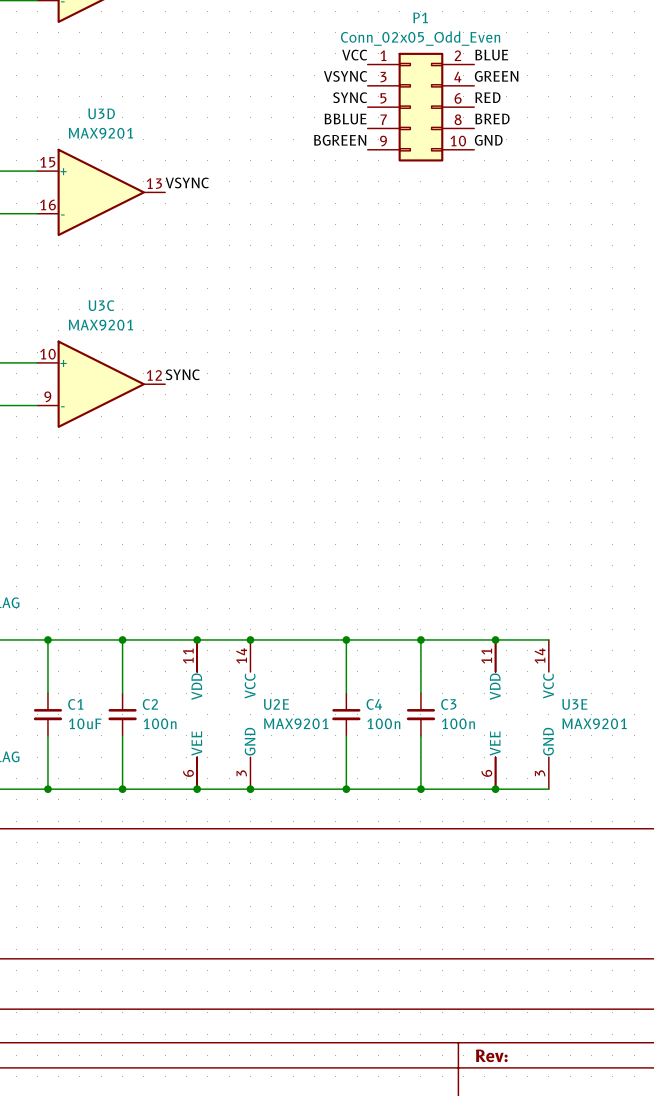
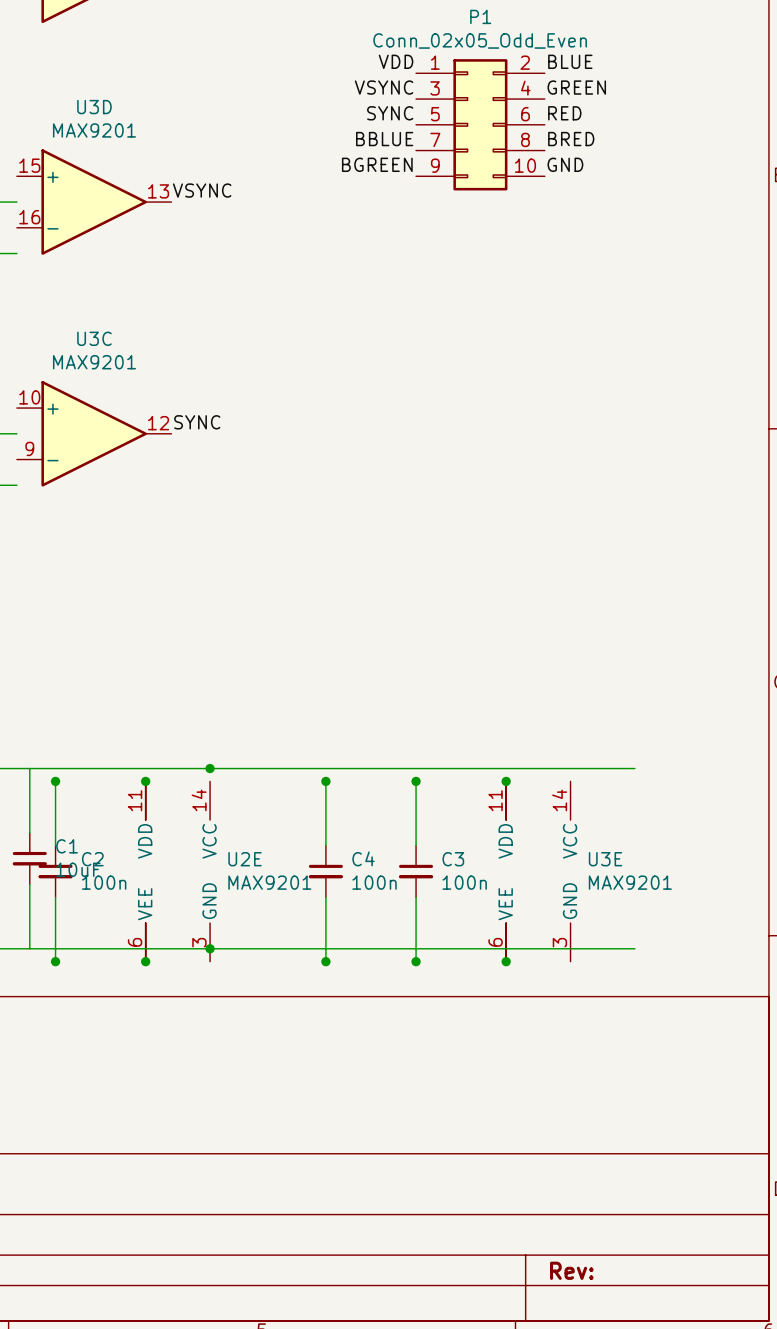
label: VCC (354, 55) -> VDD (396, 61)
label position: VSYNC (187, 182) -> VSYNC (202, 190)
U3D position: (101, 192) -> (94, 202)
label position: SYNC (182, 374) -> SYNC (197, 422)
U3C position: (101, 384) -> (94, 433)
junction position: (47, 639) -> (55, 781)
wire: (122, 639) (122, 693) -> (55, 781) (55, 845)
junction position: (122, 639) -> (145, 781)
junction: (250, 639) -> none
wire: (346, 639) (346, 693) -> (325, 781) (325, 845)
junction position: (346, 639) -> (416, 781)
wire: (420, 639) (420, 693) -> (416, 781) (416, 845)
junction position: (420, 639) -> (506, 781)
junction: (495, 639) -> none
junction: none -> (325, 781)
C2 position: (122, 714) -> (55, 871)
U2E position: (223, 714) -> (177, 871)
C4 position: (346, 714) -> (325, 871)
C3 position: (420, 714) -> (416, 871)
U3E position: (522, 714) -> (538, 871)
wire: (122, 735) (122, 789) -> (55, 897) (55, 961)
wire: (346, 735) (346, 789) -> (325, 897) (325, 961)
wire: (420, 735) (420, 789) -> (416, 897) (416, 961)
junction position: (47, 789) -> (55, 961)
junction position: (122, 789) -> (145, 961)
junction: (250, 789) -> none
junction position: (346, 789) -> (416, 961)
junction position: (420, 789) -> (506, 961)
junction: (495, 789) -> none
junction: none -> (325, 961)

